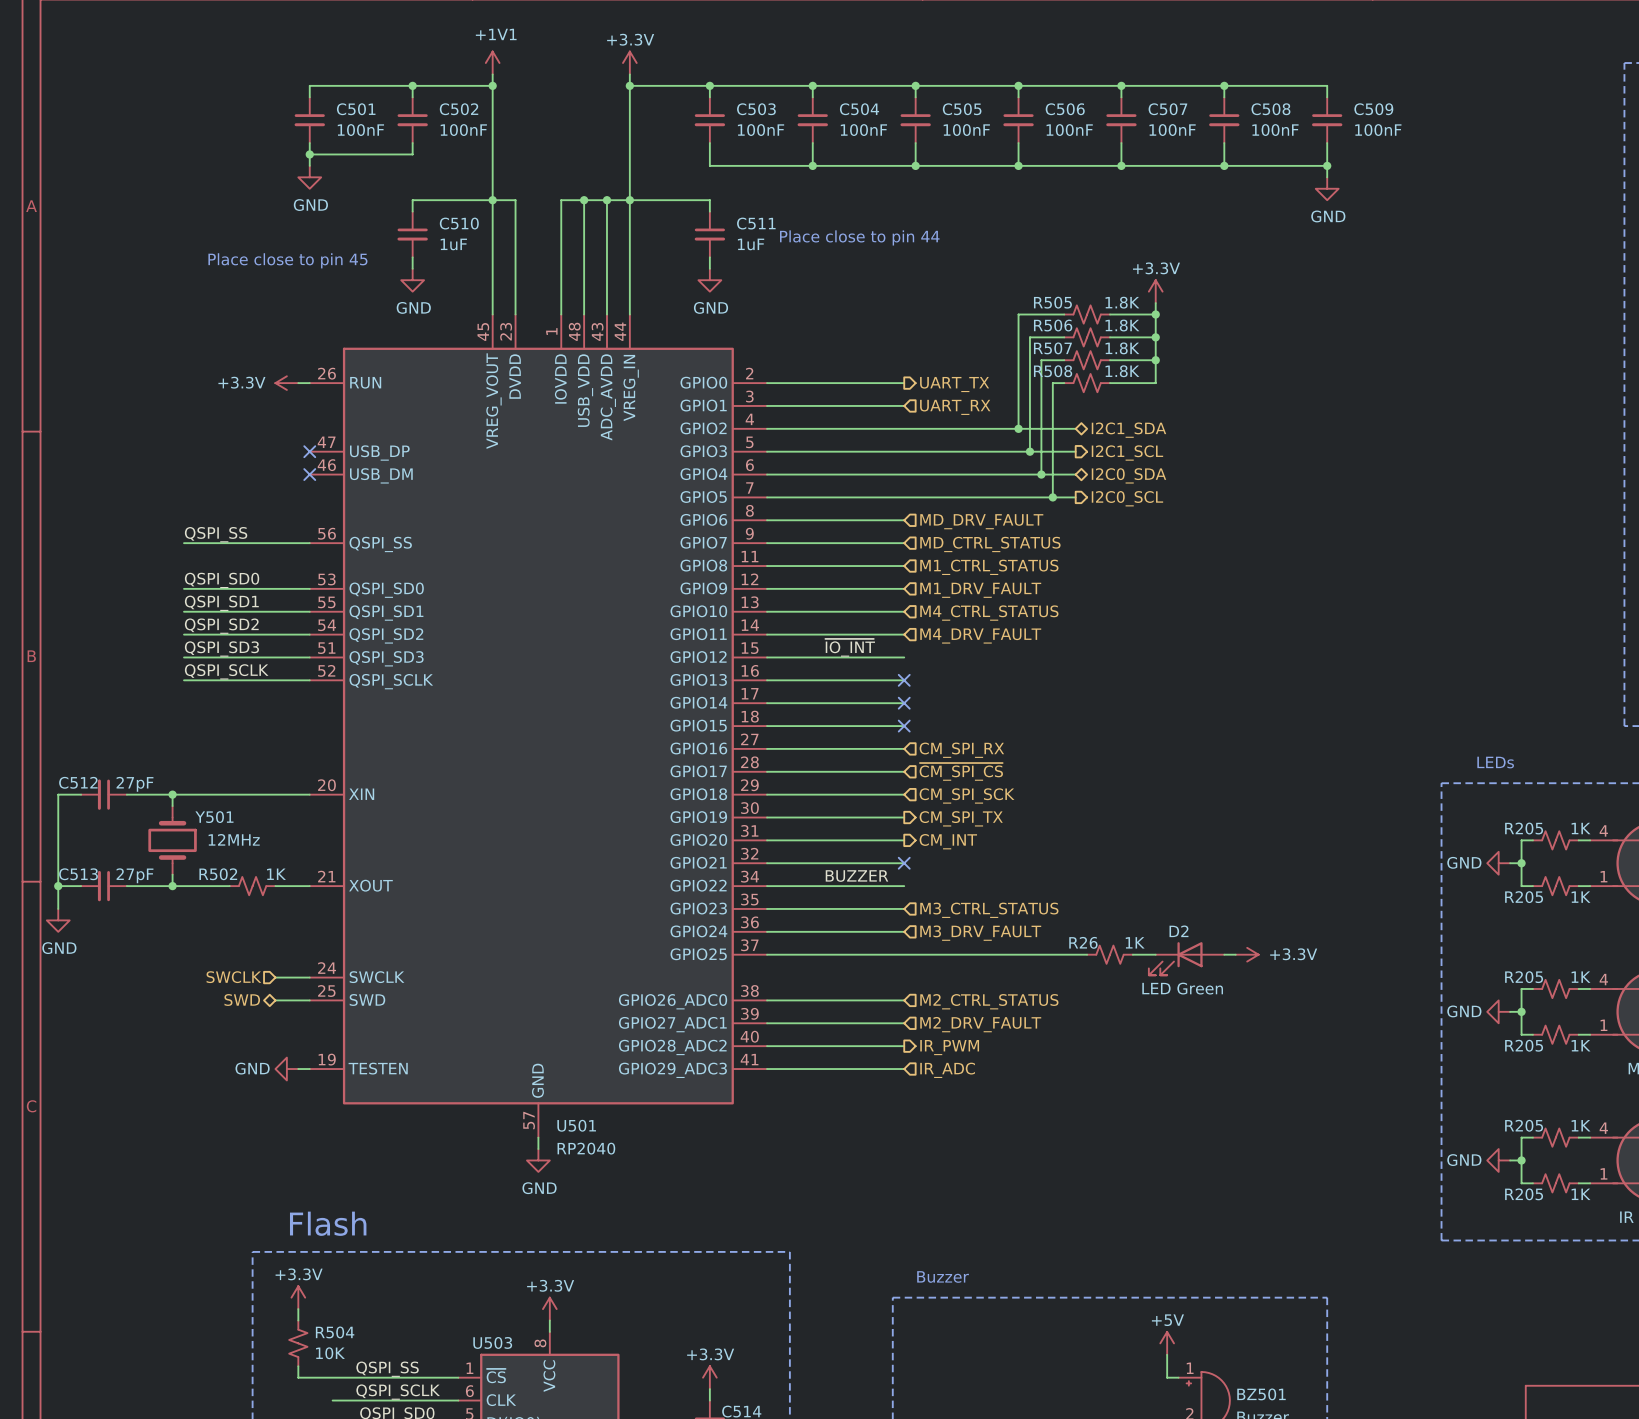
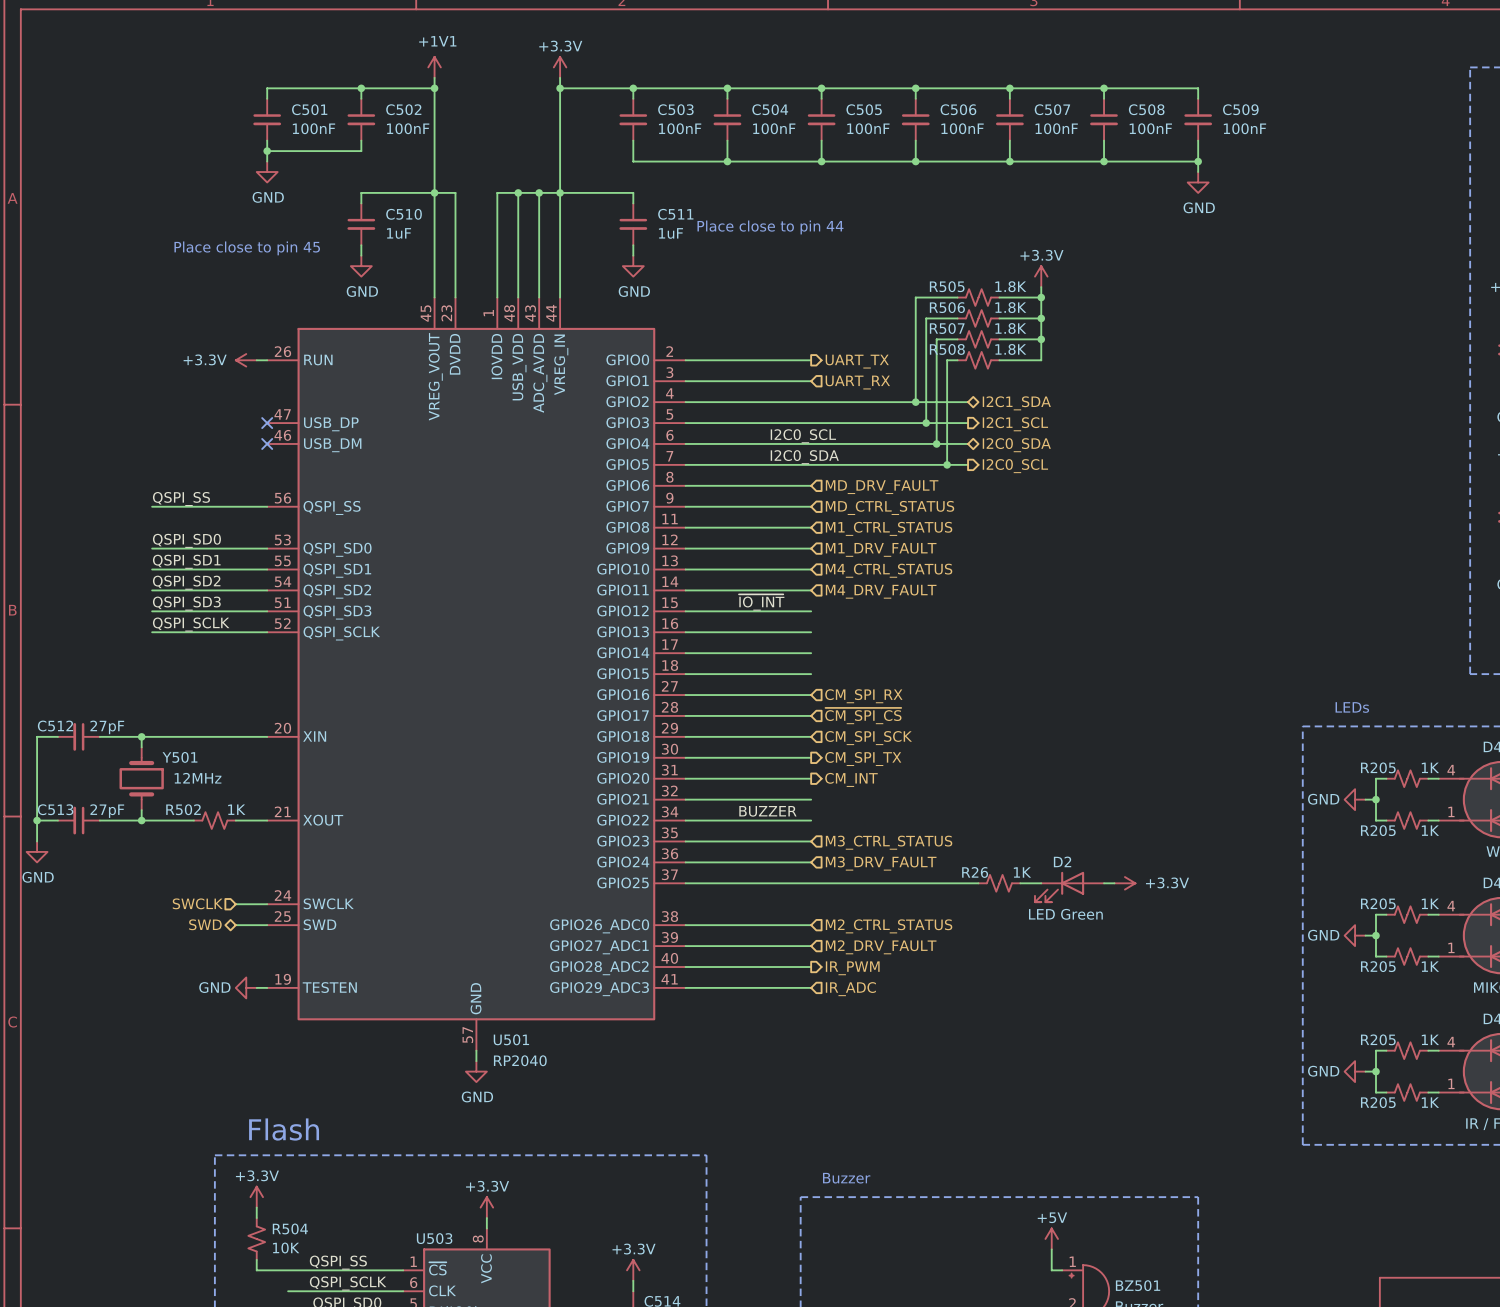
label: none -> I2C0_SCL (803, 436)
label: none -> I2C0_SDA (804, 457)
no-connect mark: (904, 680) -> none
no-connect mark: (904, 703) -> none
no-connect mark: (904, 726) -> none
no-connect mark: (904, 863) -> none

